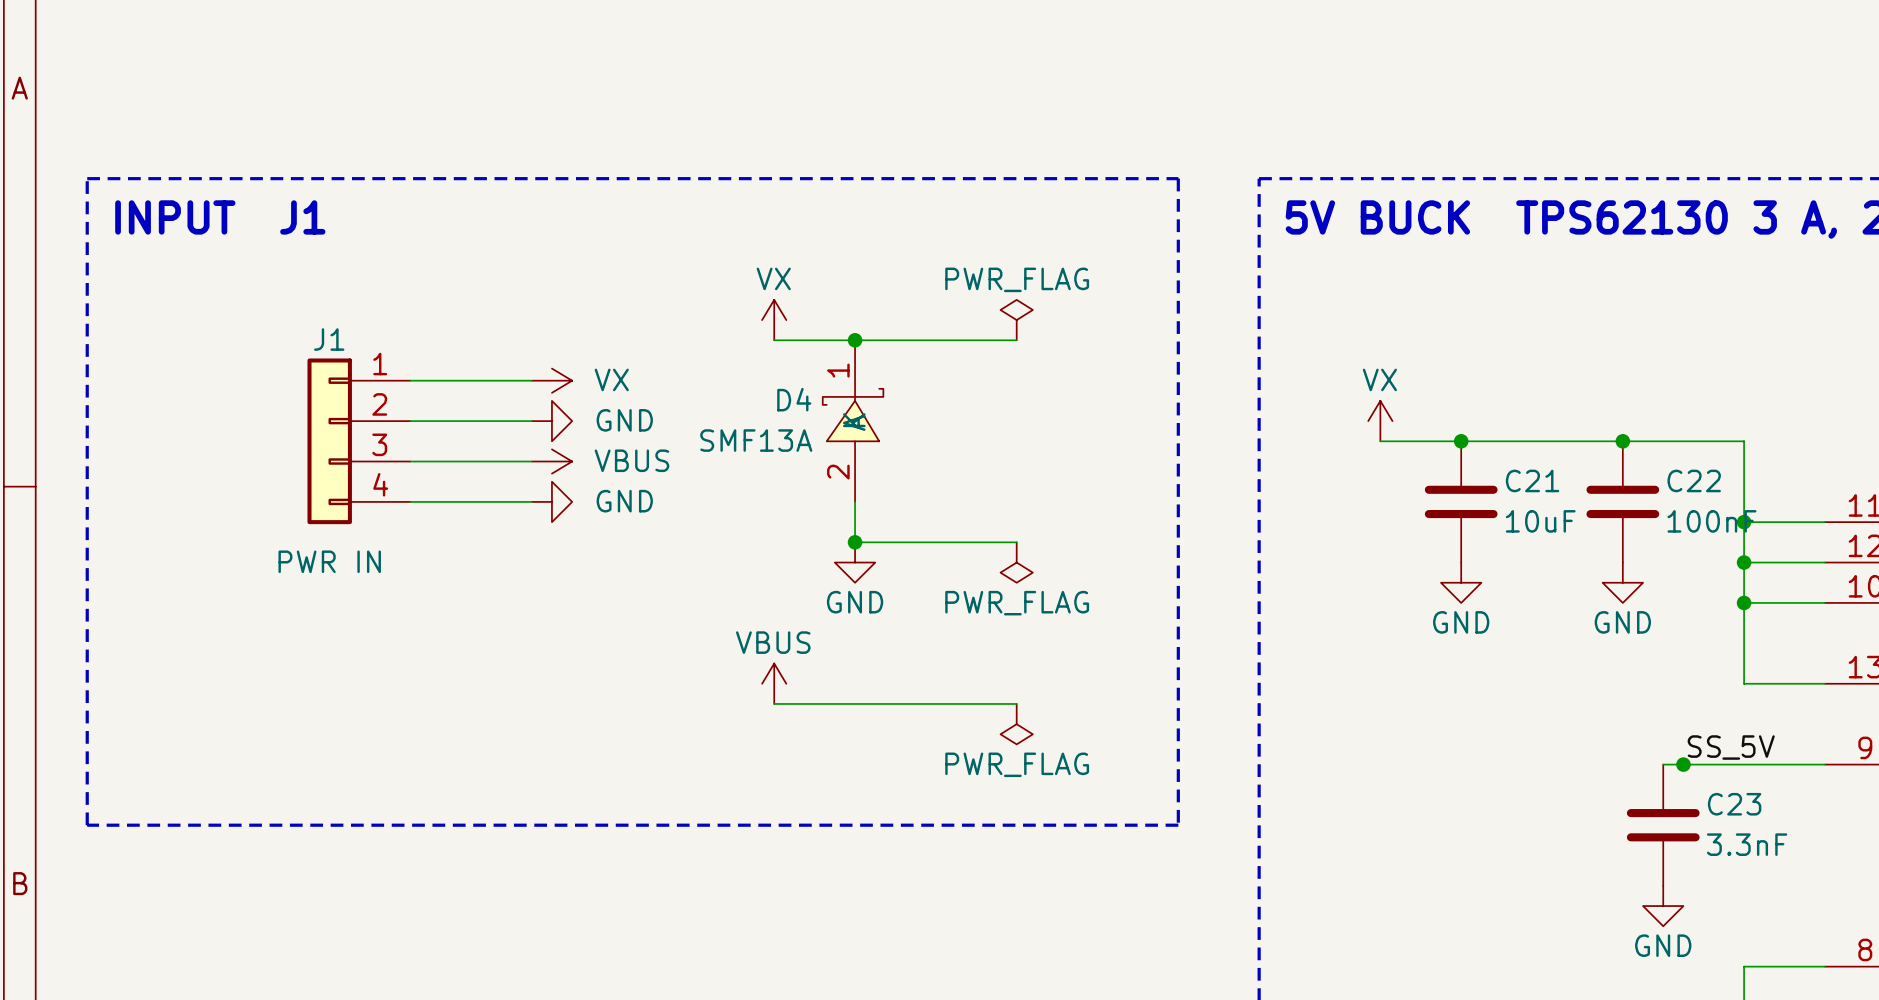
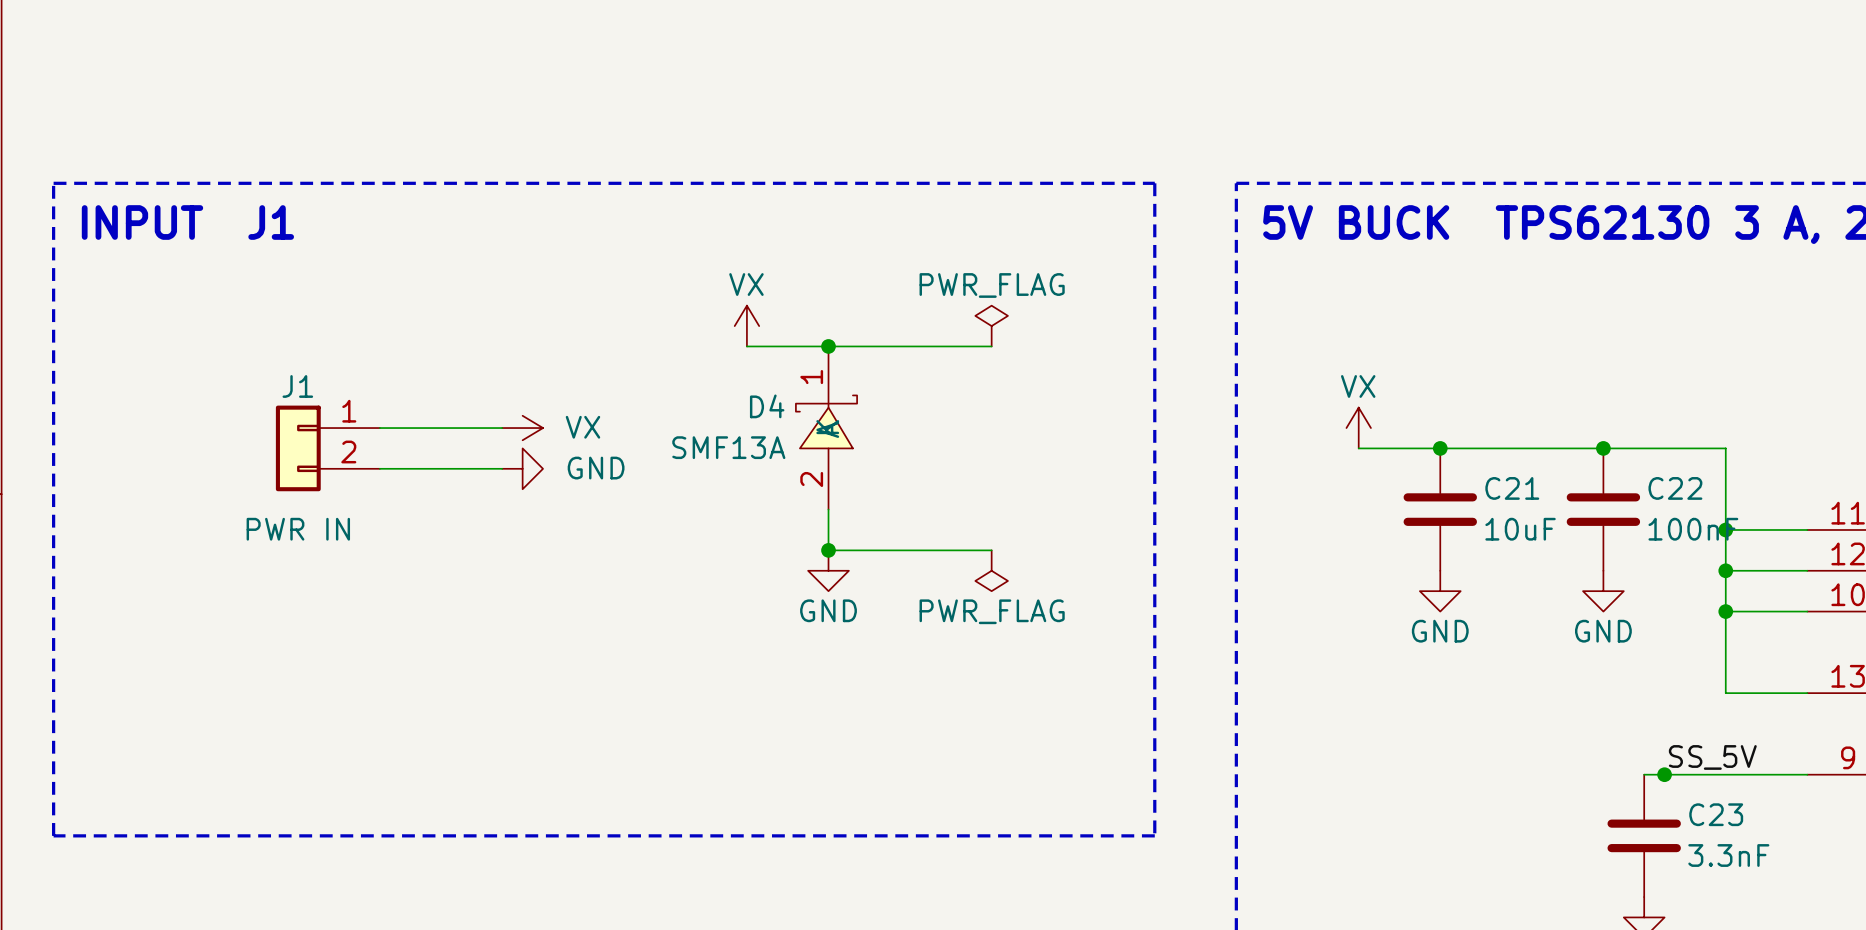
J1 name position: J1 (329, 339) -> J1 (297, 386)
J1 symbol: [307, 358, 411, 525] -> [275, 405, 380, 492]
wire: (410, 380) (531, 380) -> none
power symbol: VX (551, 380) -> none
power symbol: GND (551, 421) -> VX (522, 428)
power symbol: VBUS (551, 461) -> GND (522, 468)
wire: (410, 501) (531, 501) -> none
power symbol: GND (551, 501) -> none
J1 value position: PWR IN (329, 561) -> PWR IN (298, 529)
power symbol: VBUS (774, 683) -> none
wire: (774, 703) (1016, 703) -> none
power symbol: PWR_FLAG (1016, 724) -> none

